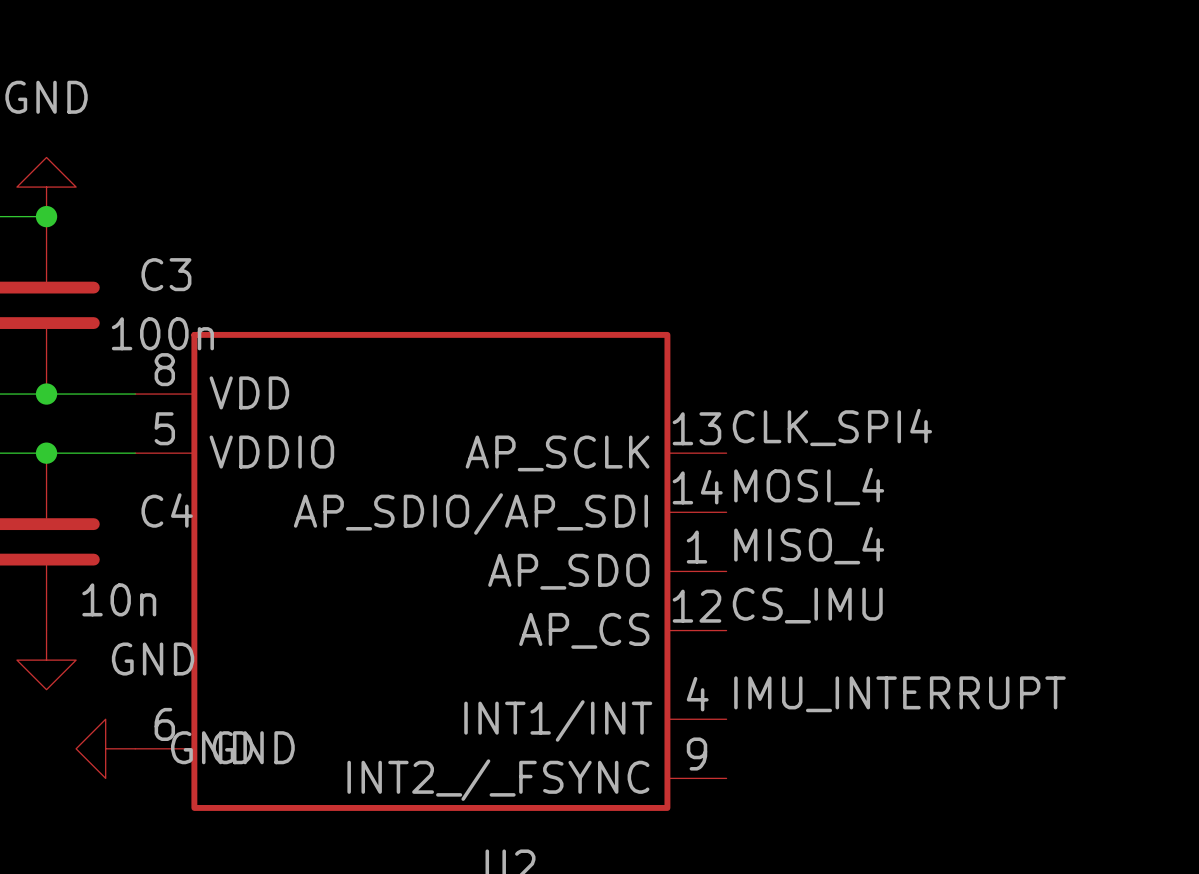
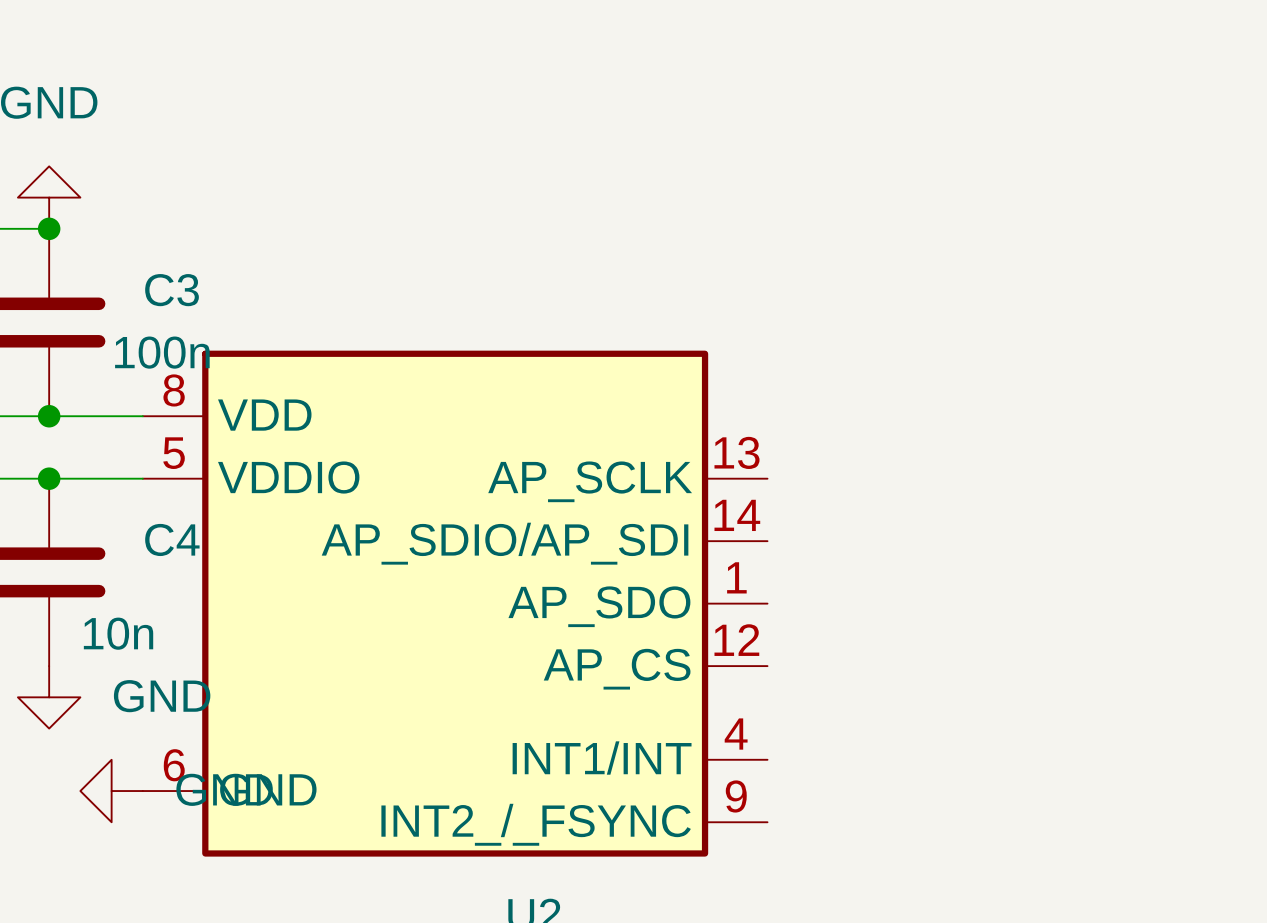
label: CLK_SPI4 (832, 427) -> none
label: MOSI_4 (809, 486) -> none
label: MISO_4 (809, 545) -> none
label: CS_IMU (807, 605) -> none
label: IMU_INTERRUPT (899, 694) -> none

